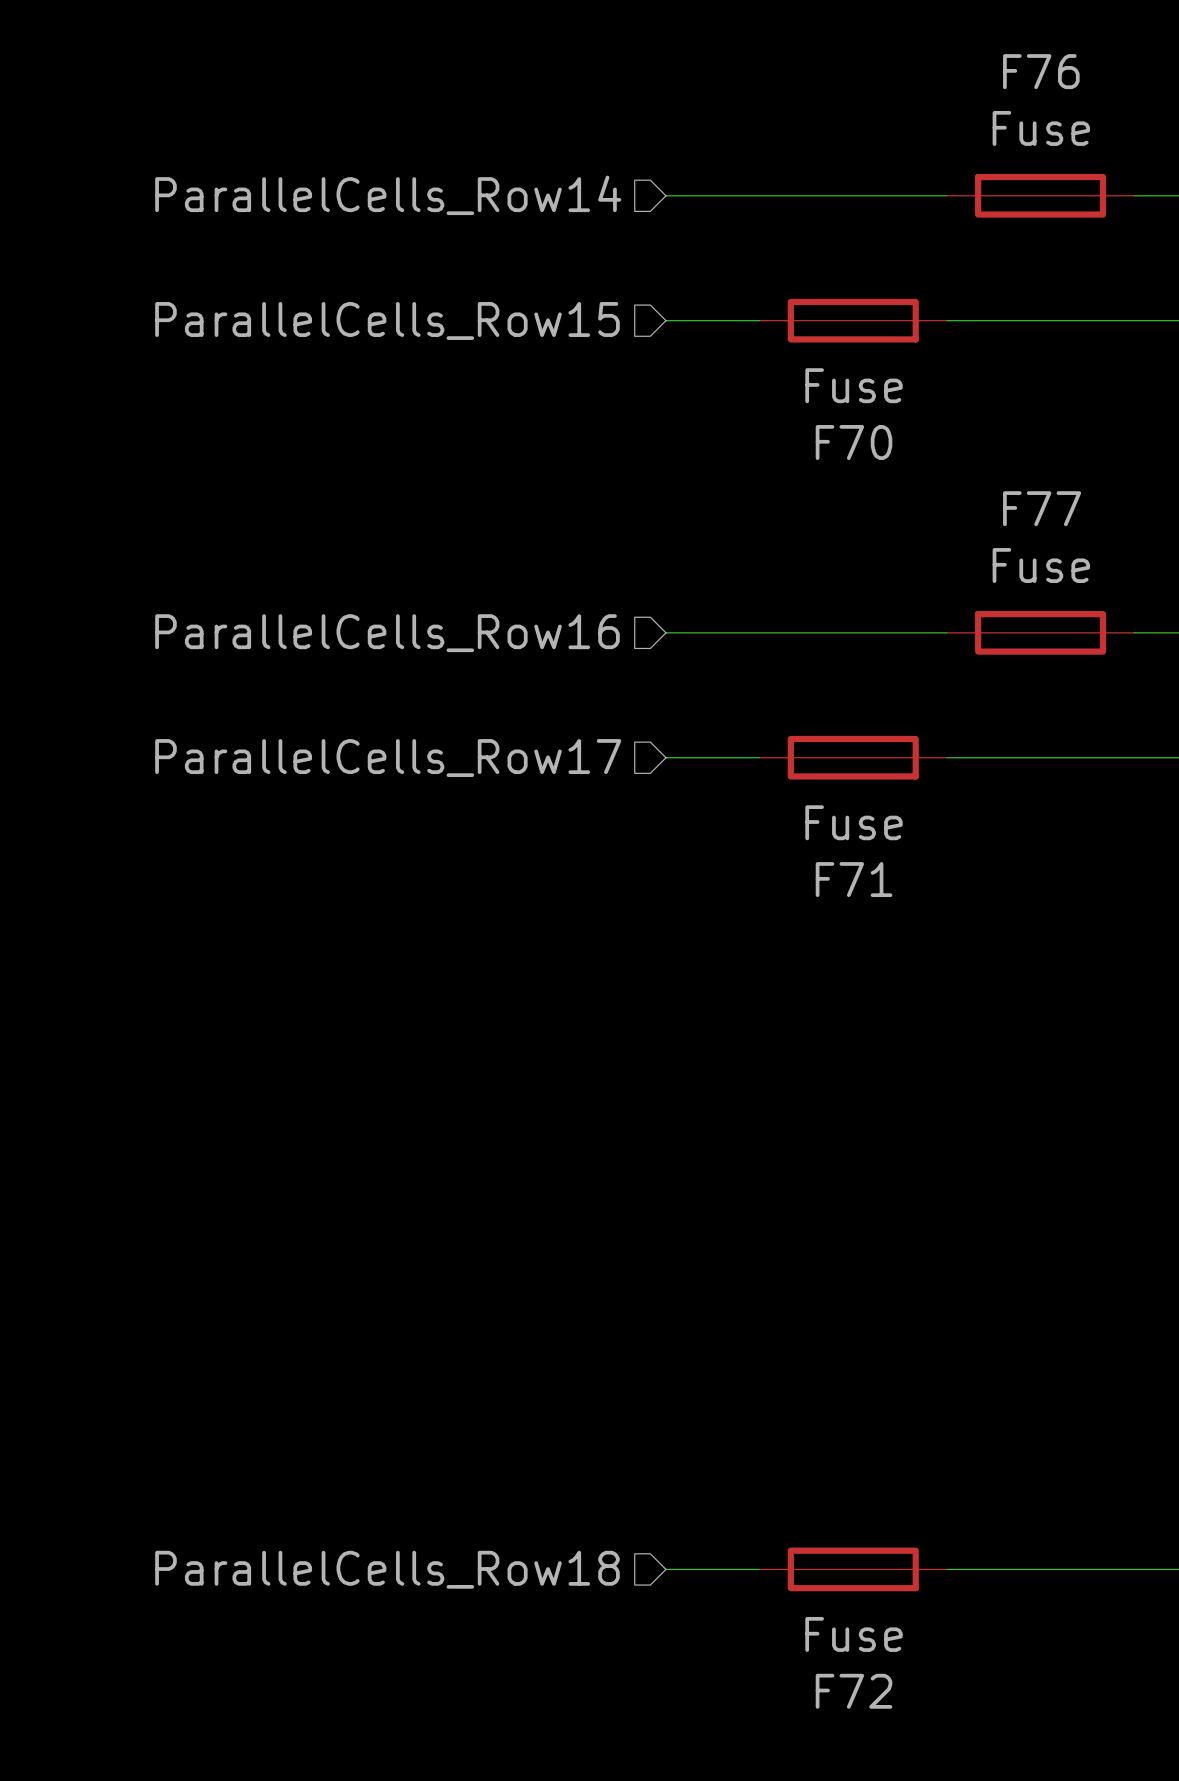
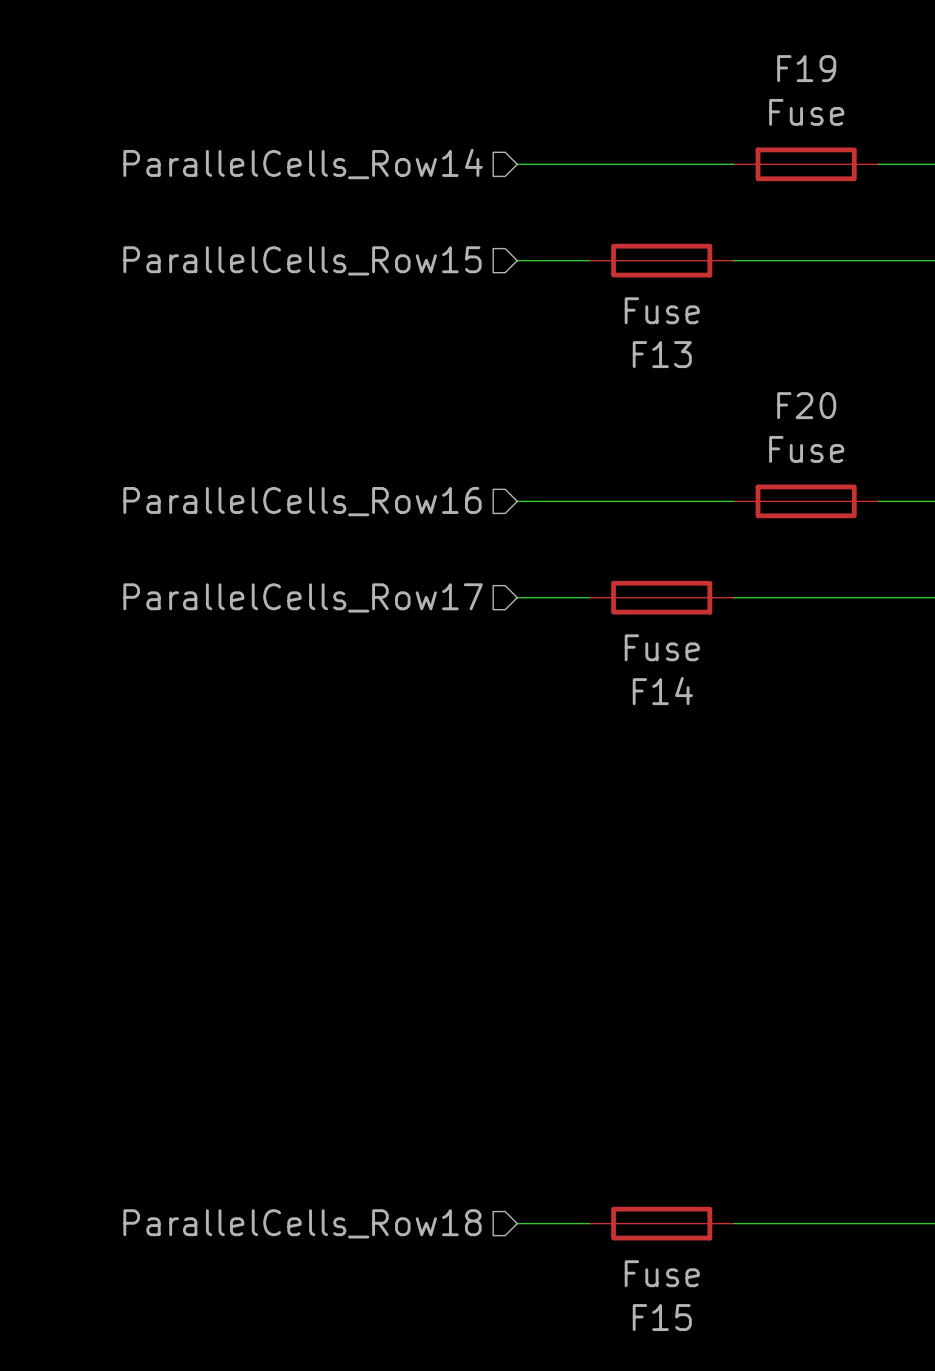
F76 name: F76 (1041, 71) -> F19 (806, 68)
F70 name: F70 (854, 442) -> F13 (662, 354)
F77 name: F77 (1042, 508) -> F20 (806, 405)
F71 name: F71 (854, 879) -> F14 (662, 691)
F72 name: F72 (854, 1691) -> F15 (662, 1317)

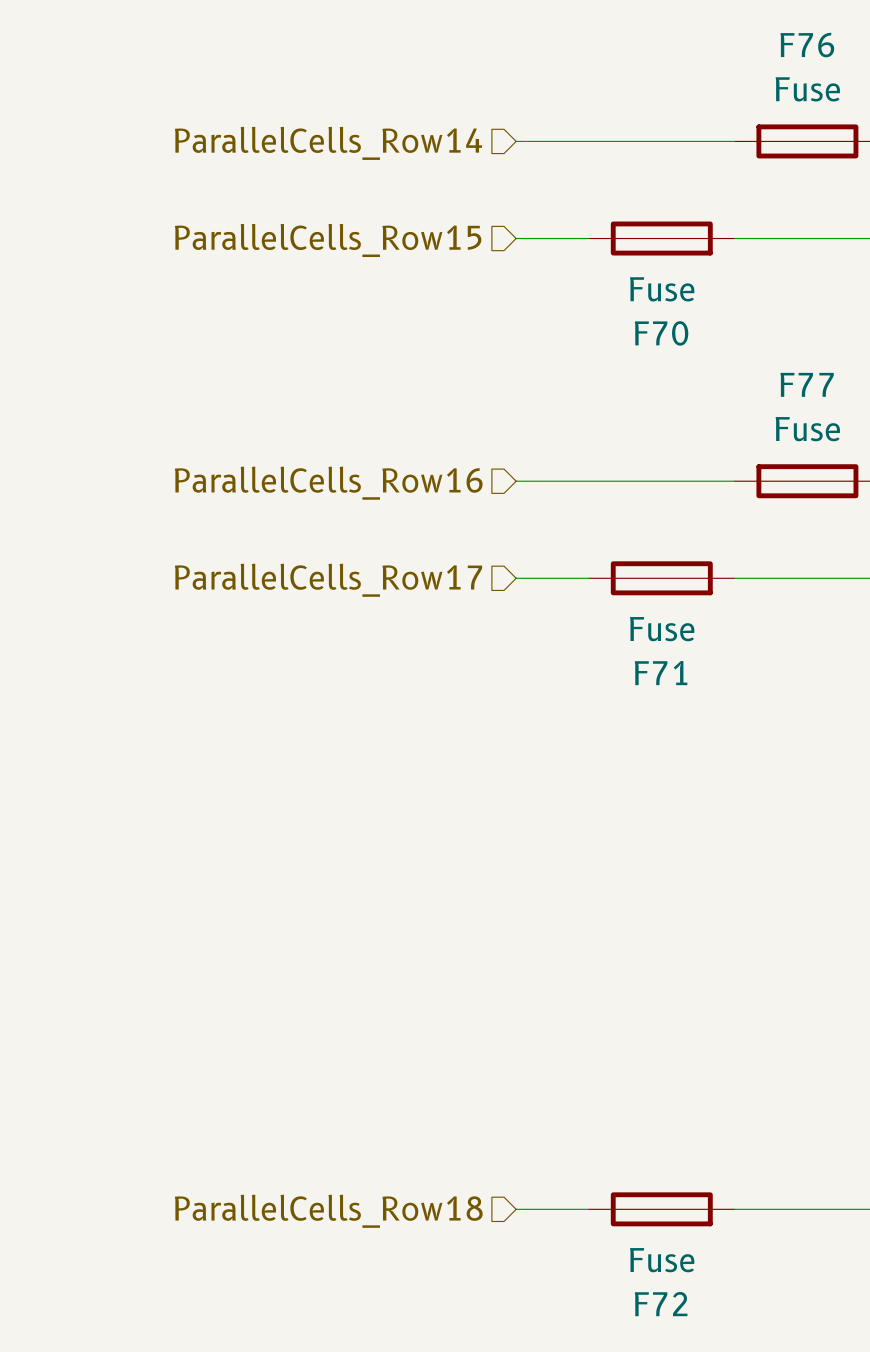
F19 name: F19 (806, 68) -> F76 (807, 45)
F13 name: F13 (662, 354) -> F70 (661, 333)
F20 name: F20 (806, 405) -> F77 (807, 384)
F14 name: F14 (662, 691) -> F71 (661, 673)
F15 name: F15 (662, 1317) -> F72 (661, 1304)

